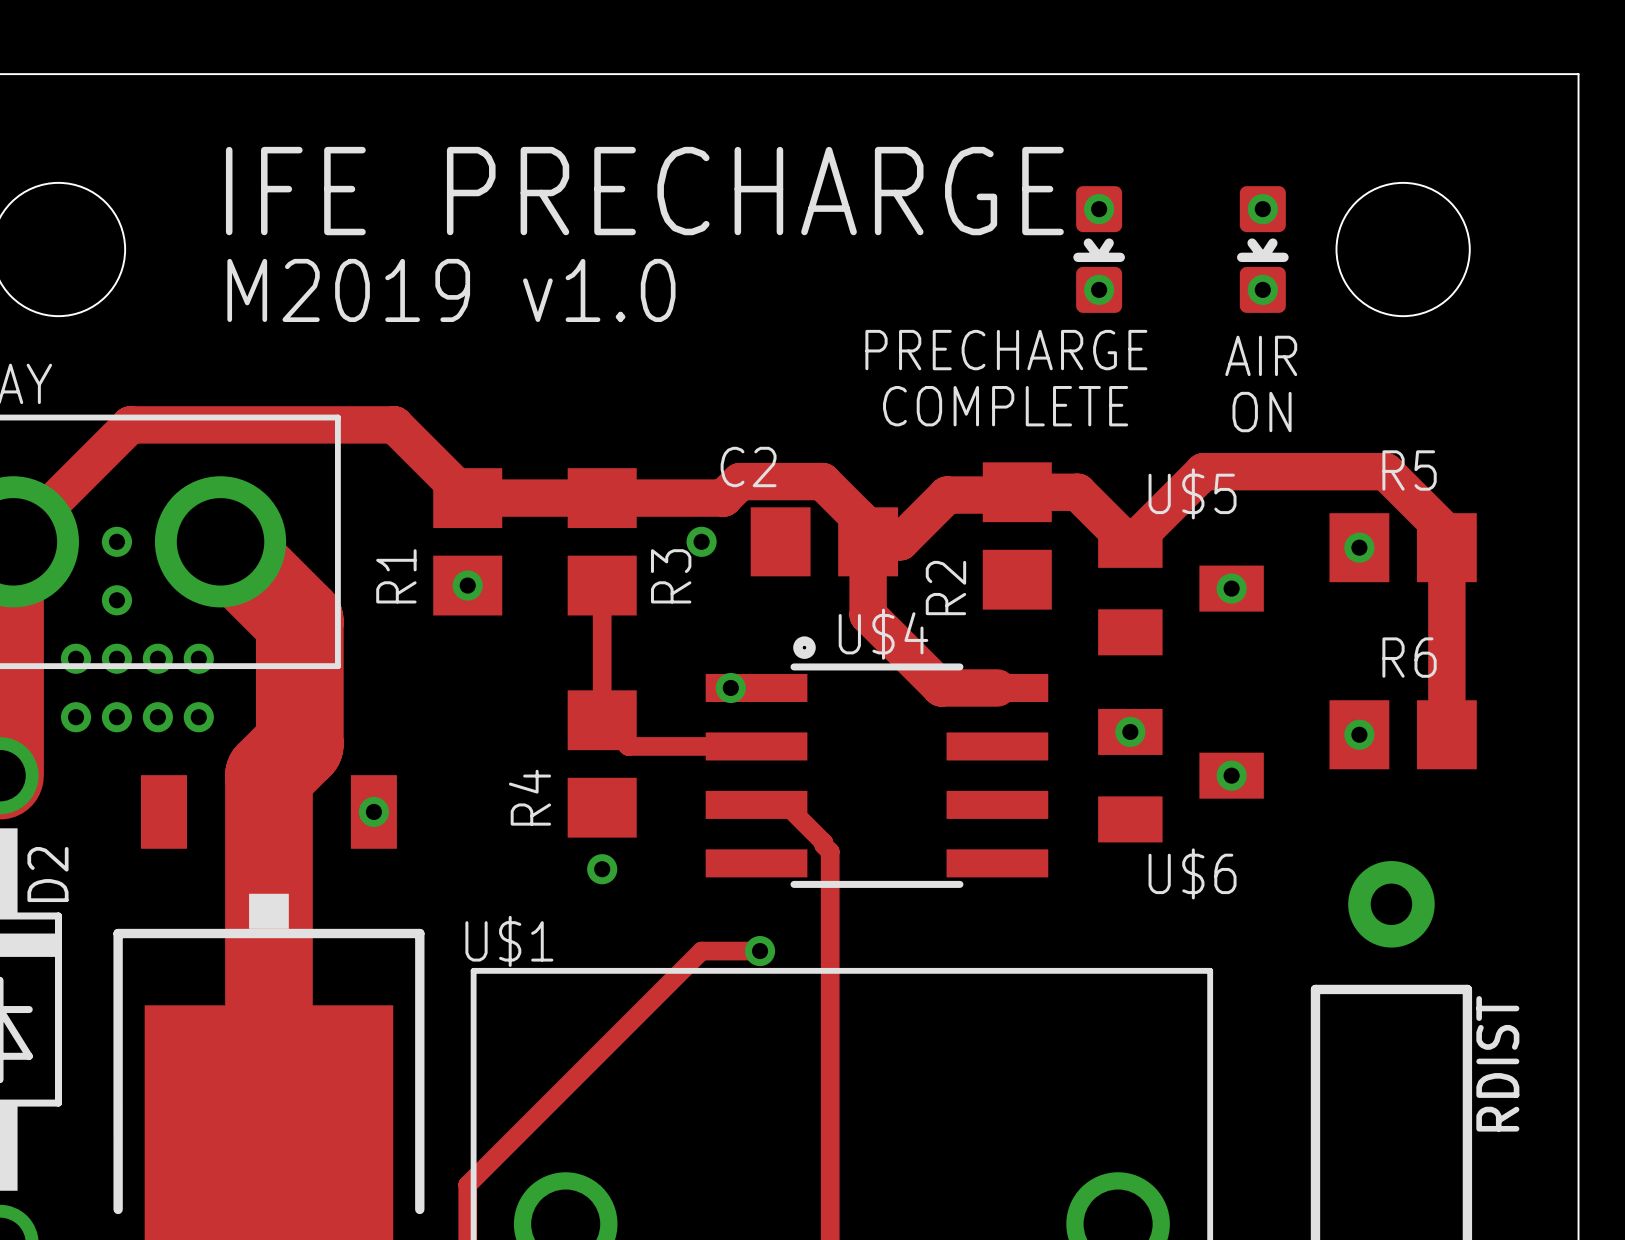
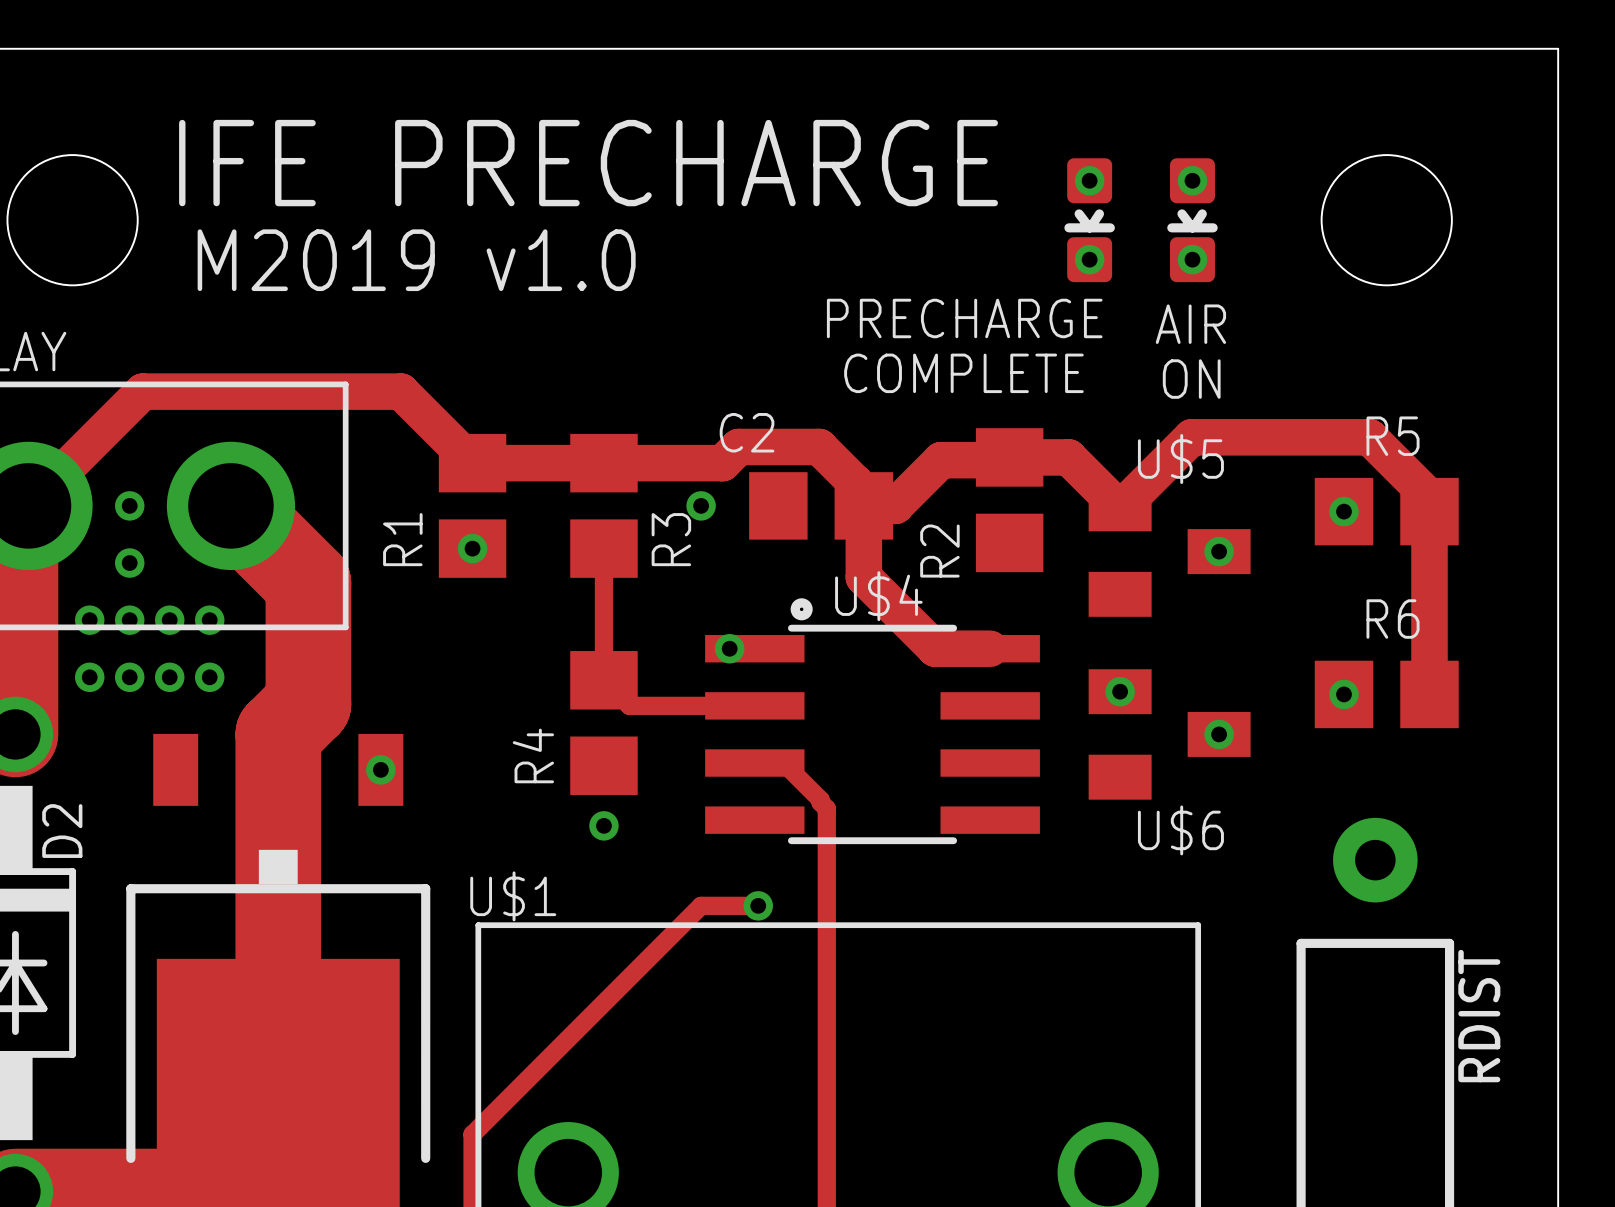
text position: IFE PRECHARGE (644, 191) -> IFE PRECHARGE (588, 163)
via: none -> (1192, 180)
via: (1262, 209) -> none
part position: (1262, 249) -> (1192, 220)
via: none -> (1192, 259)
via: (1262, 289) -> none
text position: M2019 v1.0 (451, 290) -> M2019 v1.0 (416, 260)
text position: PRECHARGE (1006, 350) -> PRECHARGE (964, 318)
text position: AIR (1261, 355) -> AIR (1190, 324)
text position: COMPLETE (1005, 406) -> COMPLETE (963, 373)
text position: ON (1262, 412) -> ON (1191, 379)

